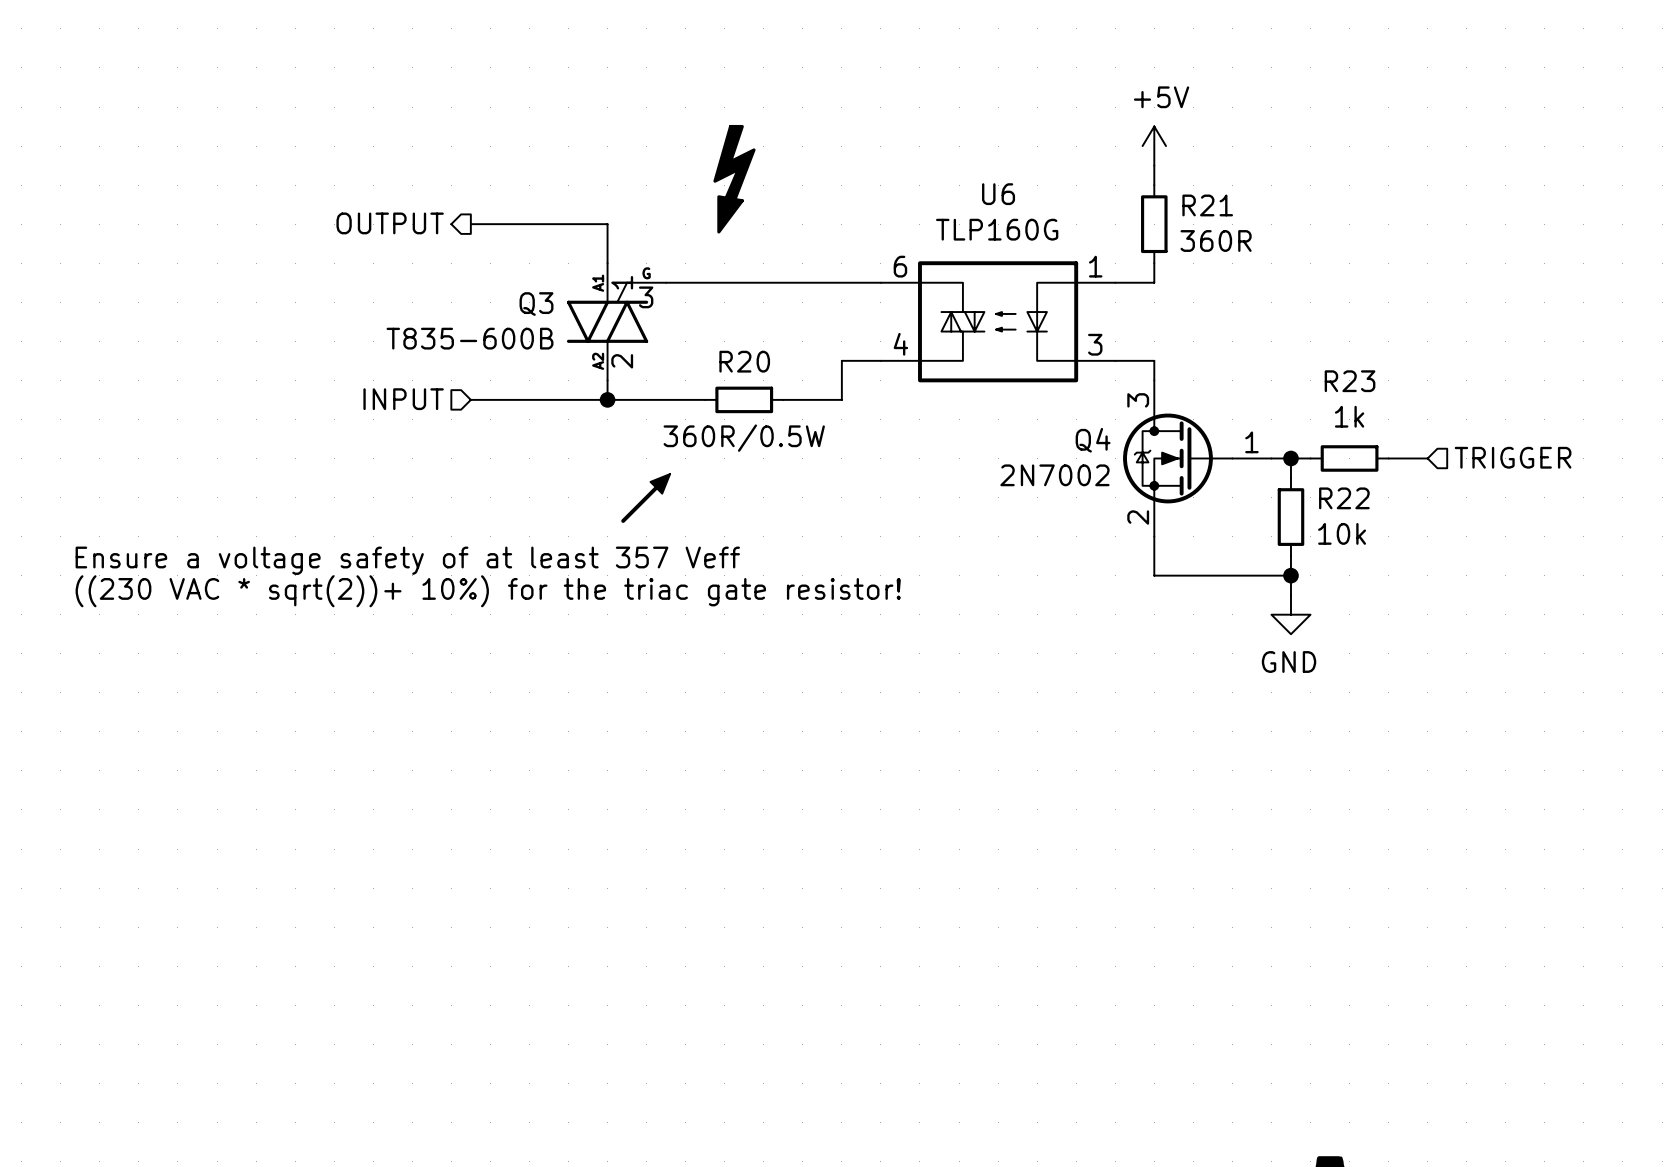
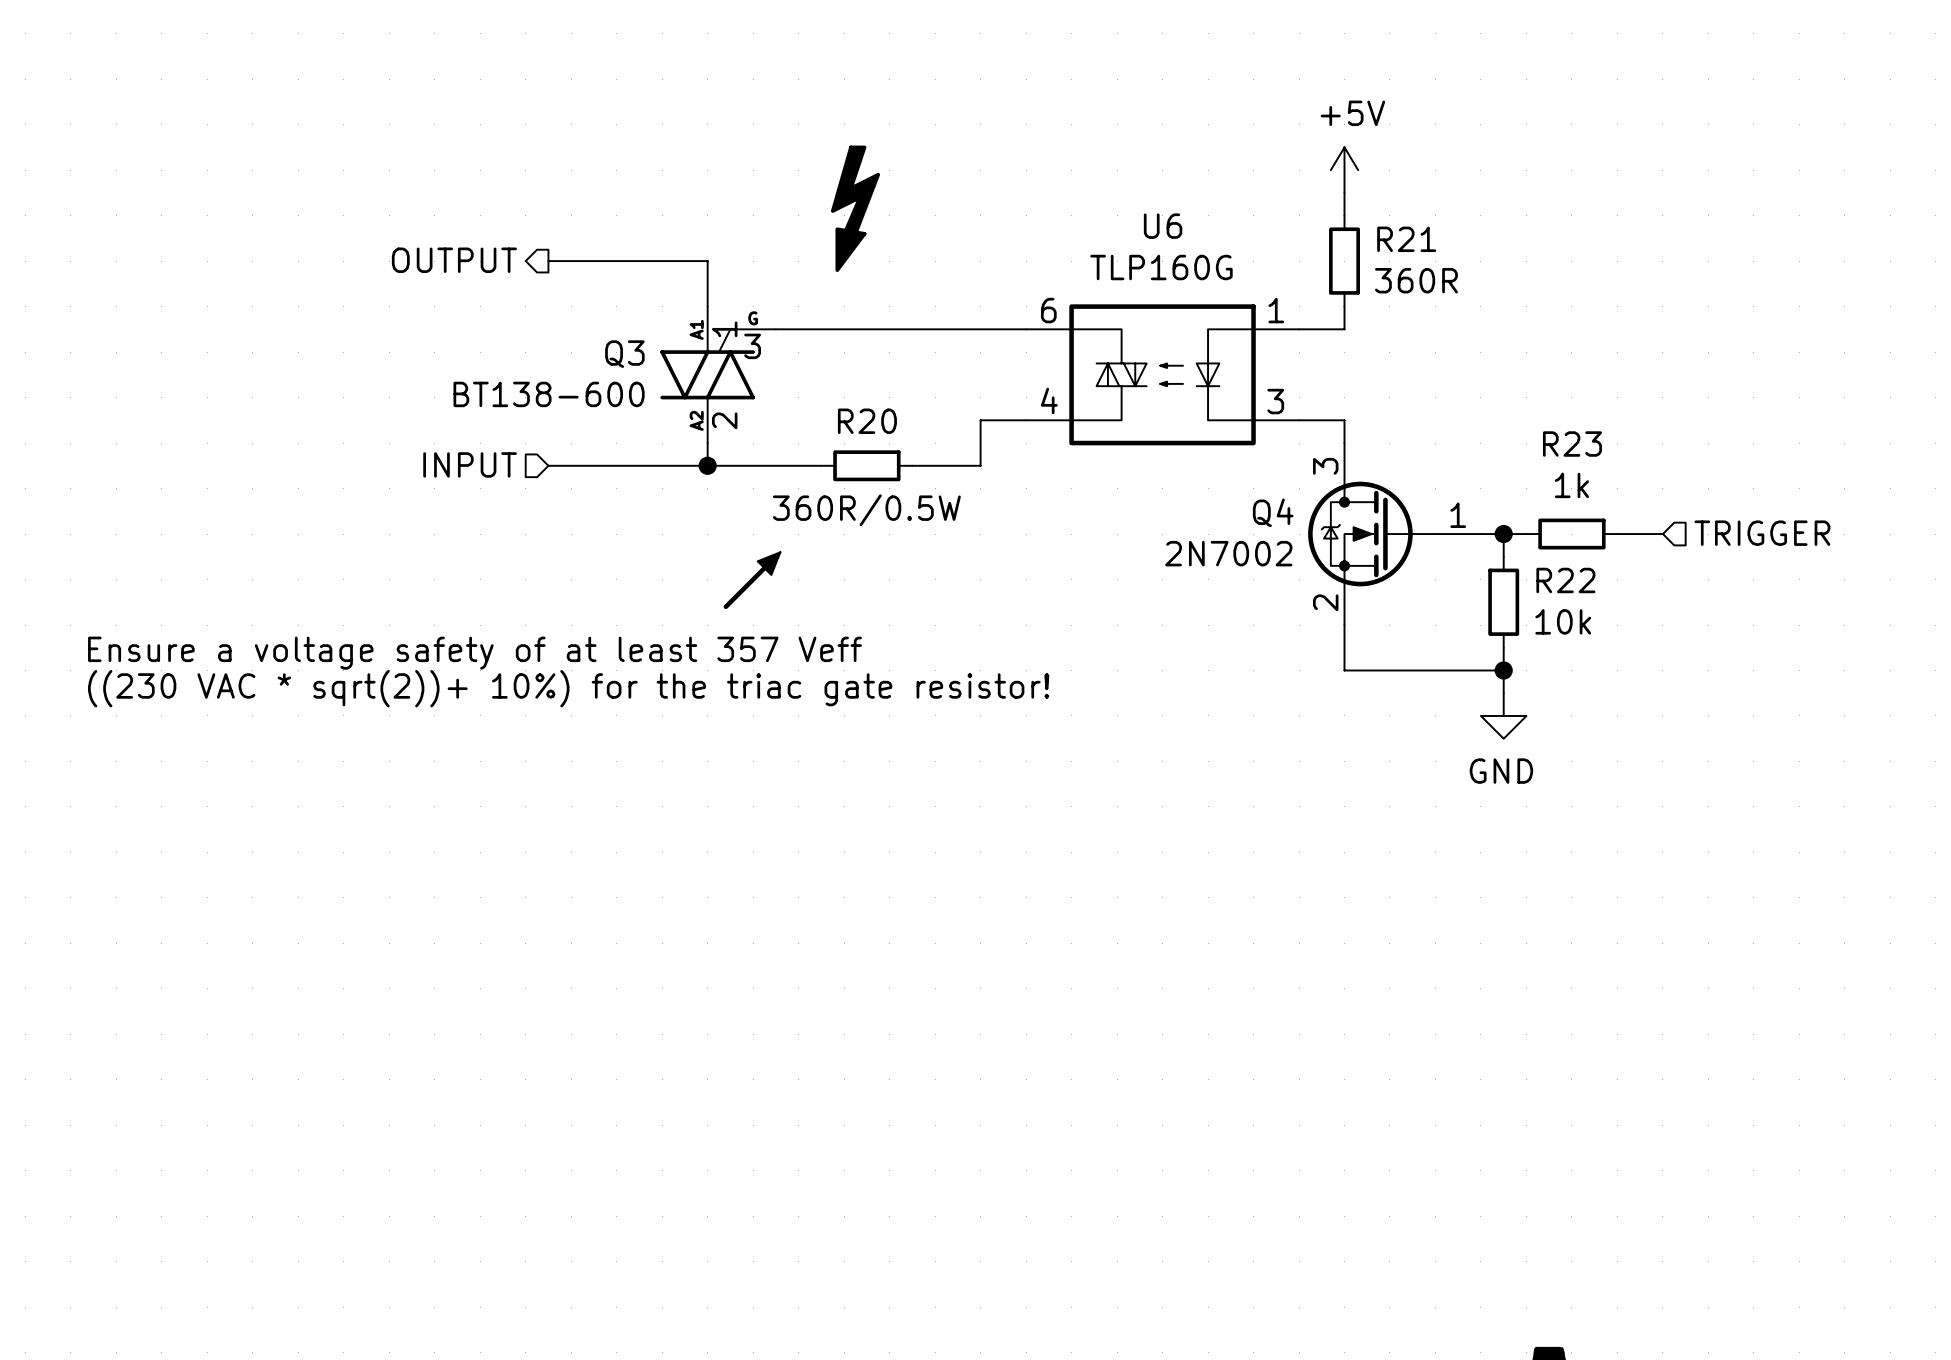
Q3 value: T835-600B (470, 338) -> BT138-600 (549, 394)

